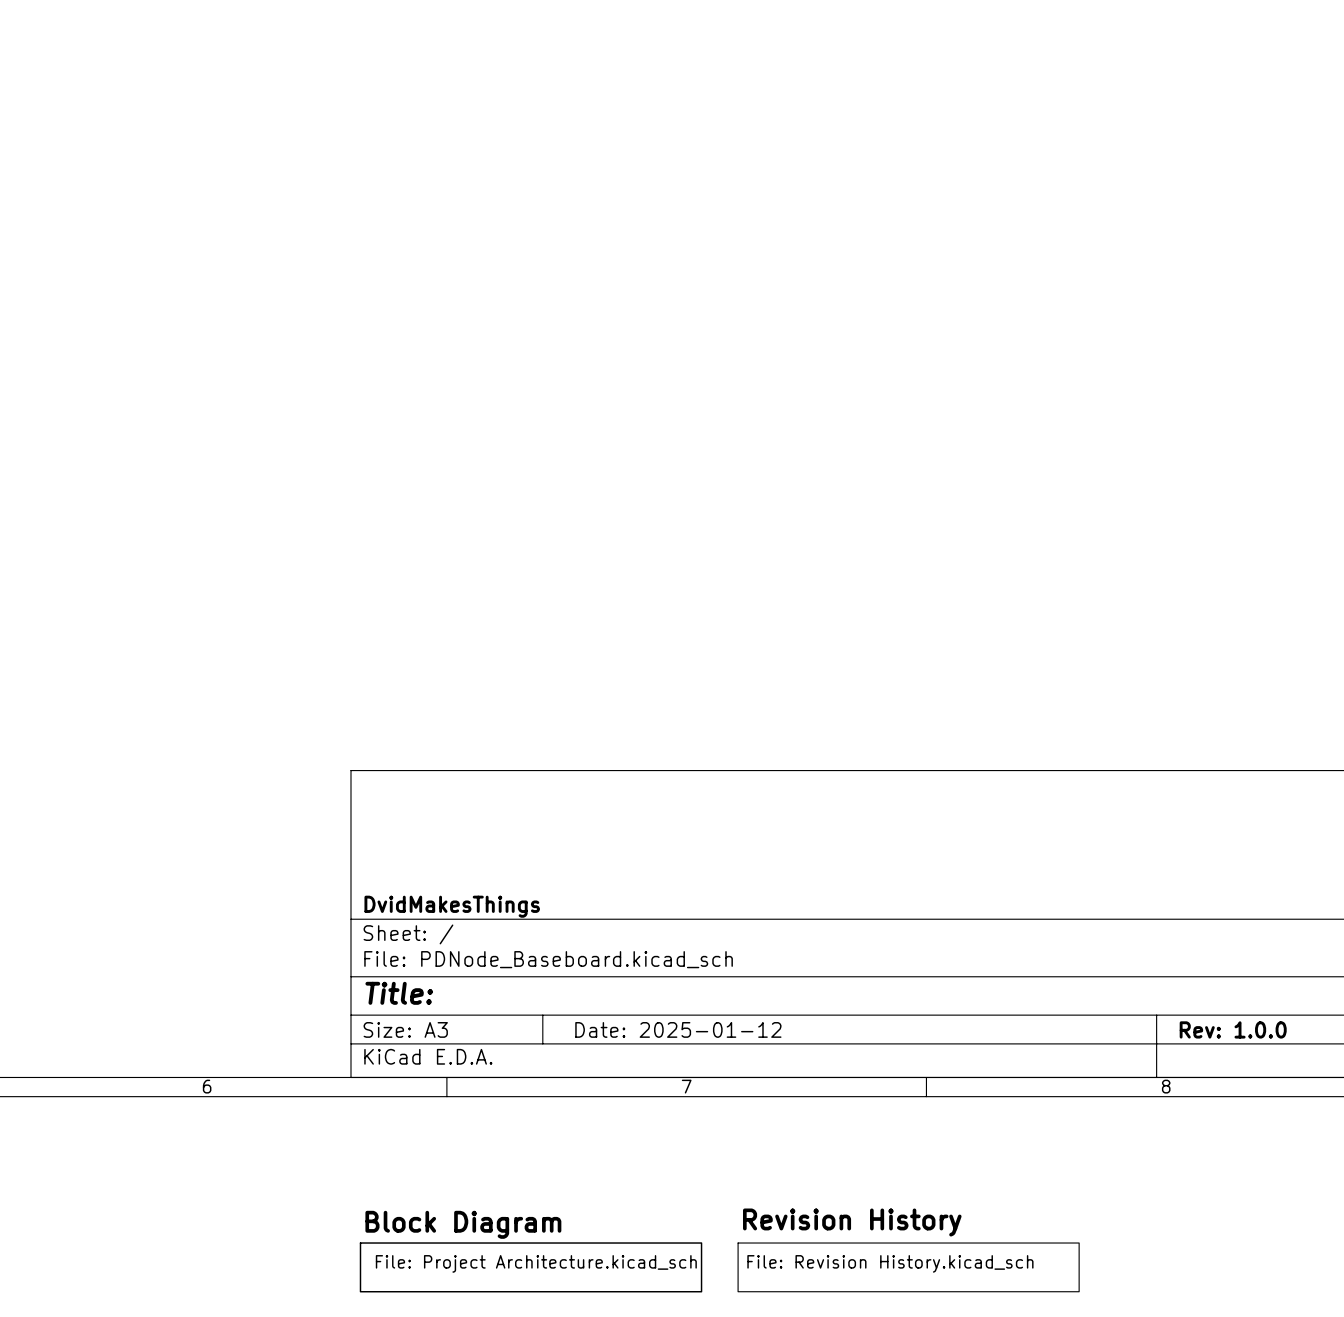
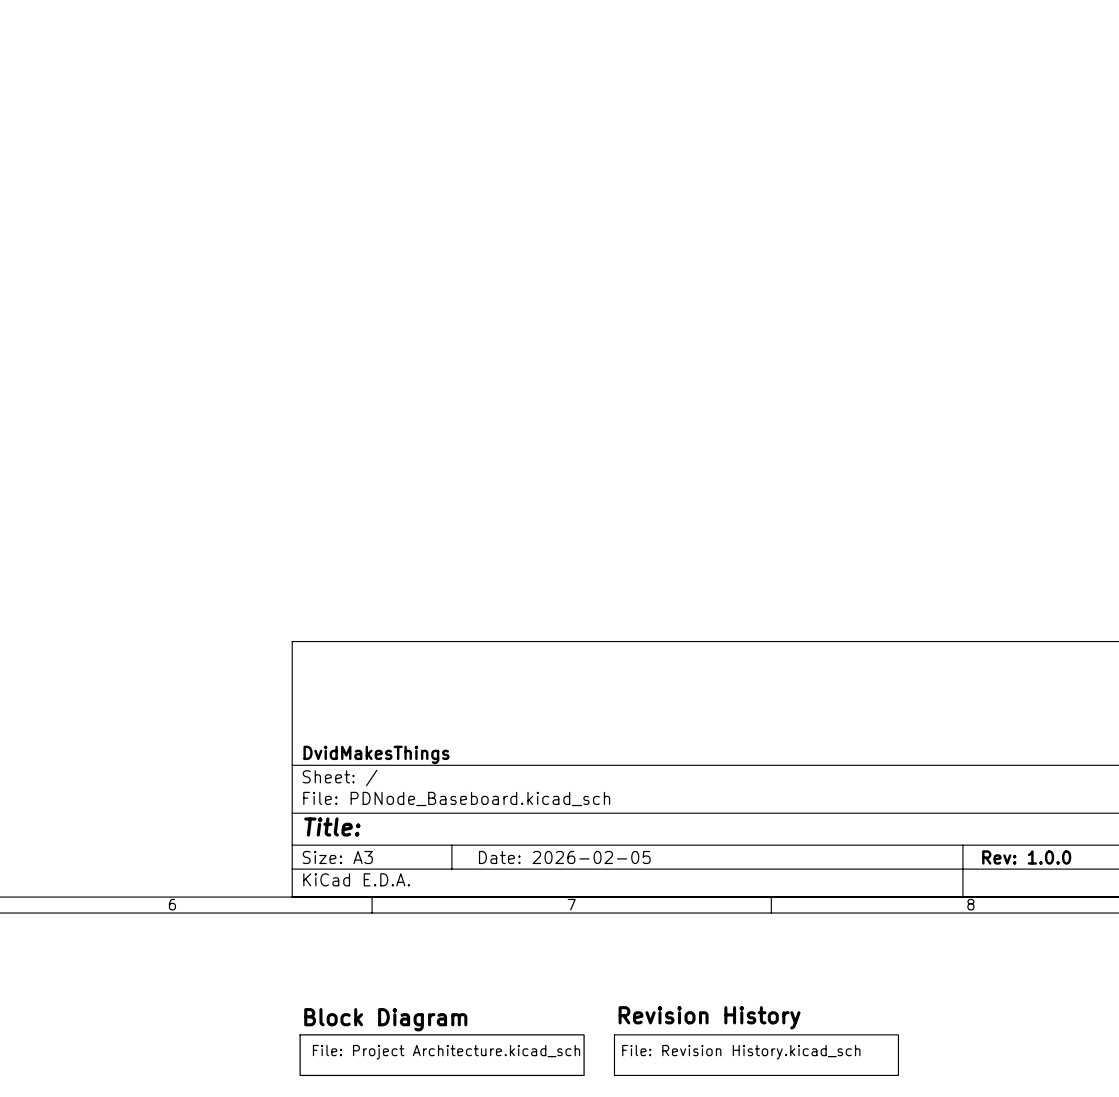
title block: Date: 2025-01-12 (678, 1029) -> Date: 2026-02-05 (564, 857)

